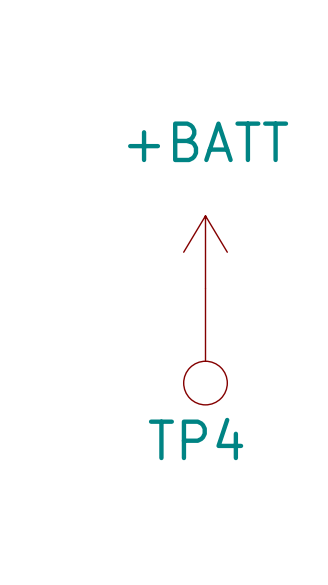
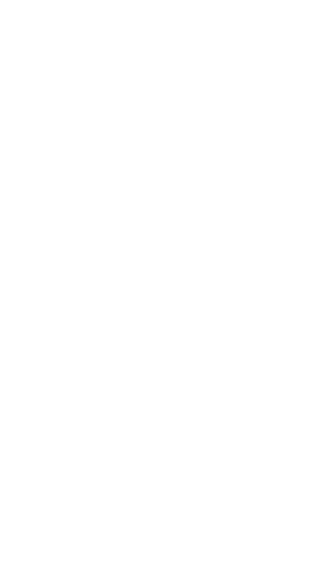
power symbol: +BATT (205, 252) -> none
TP4: (205, 346) -> none

